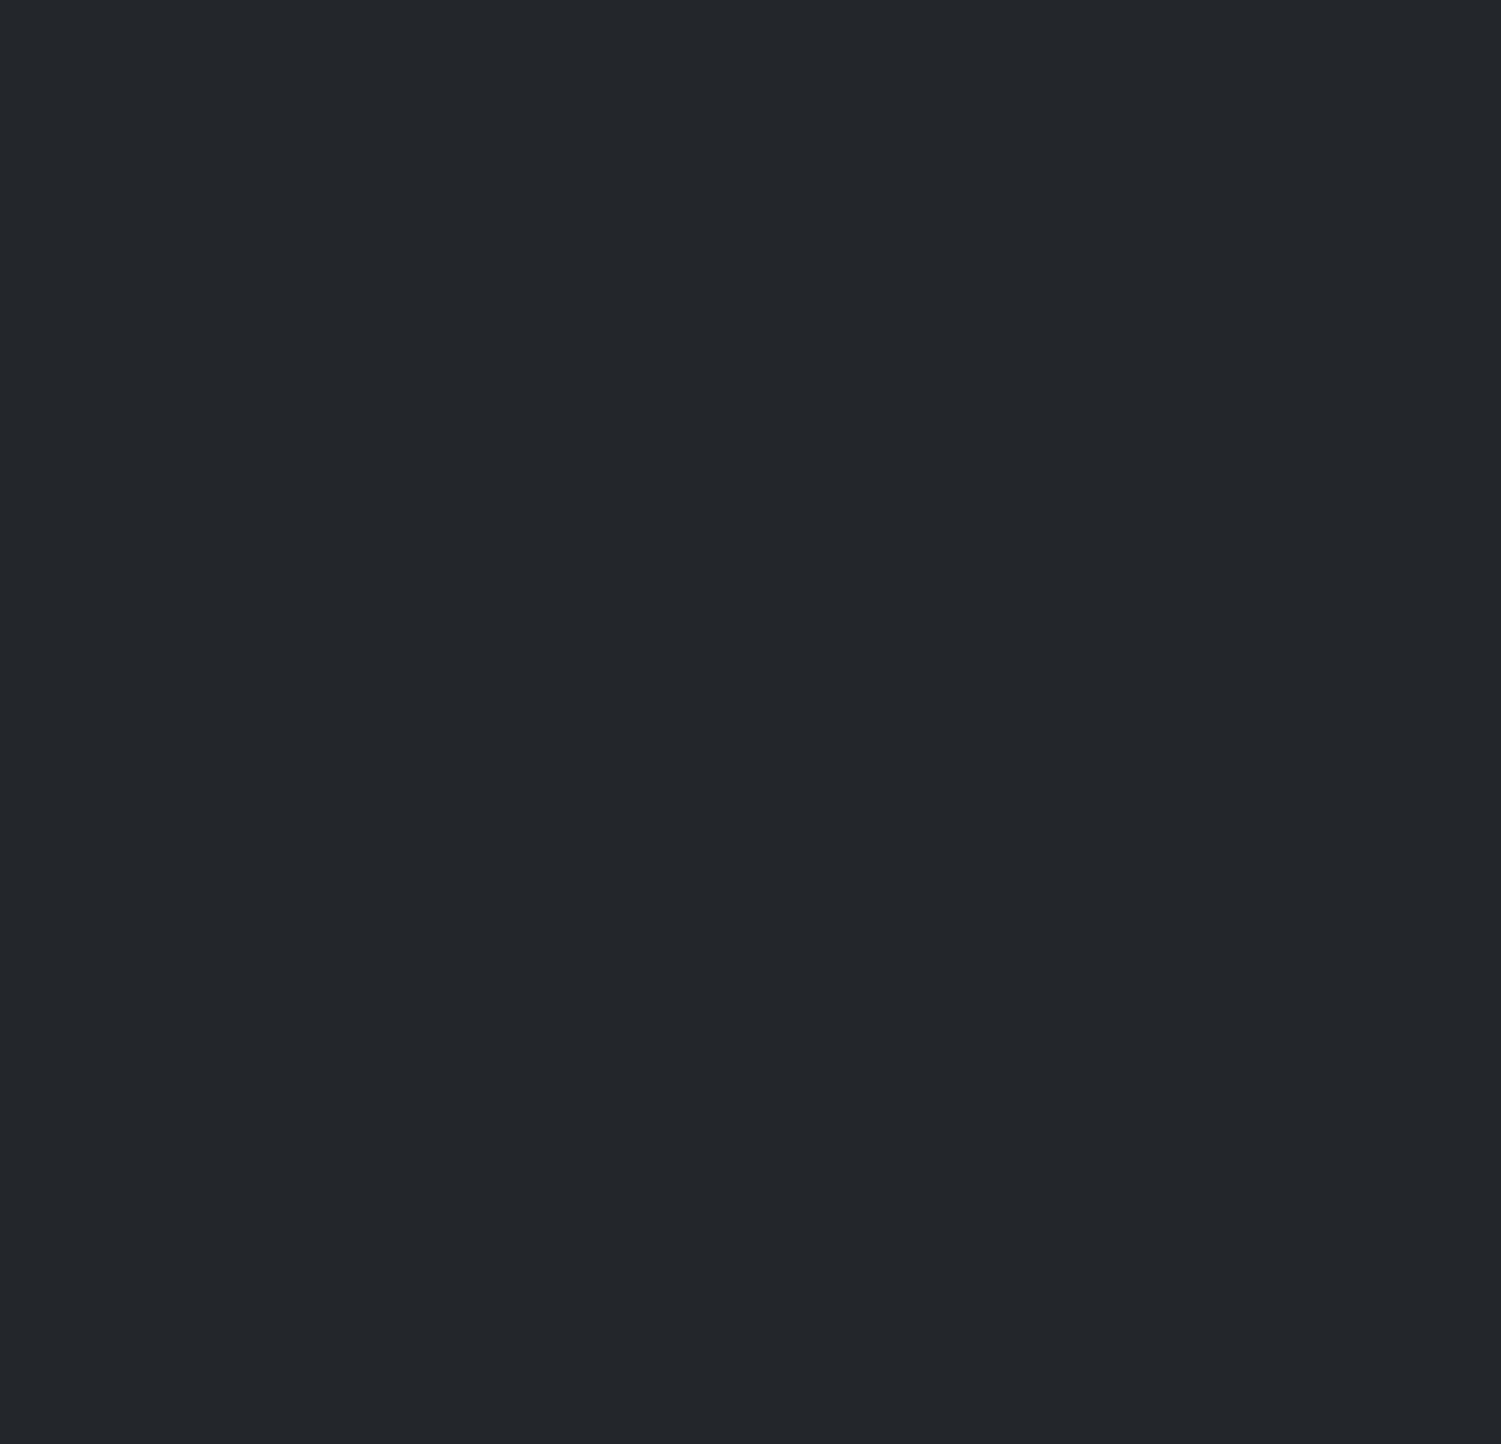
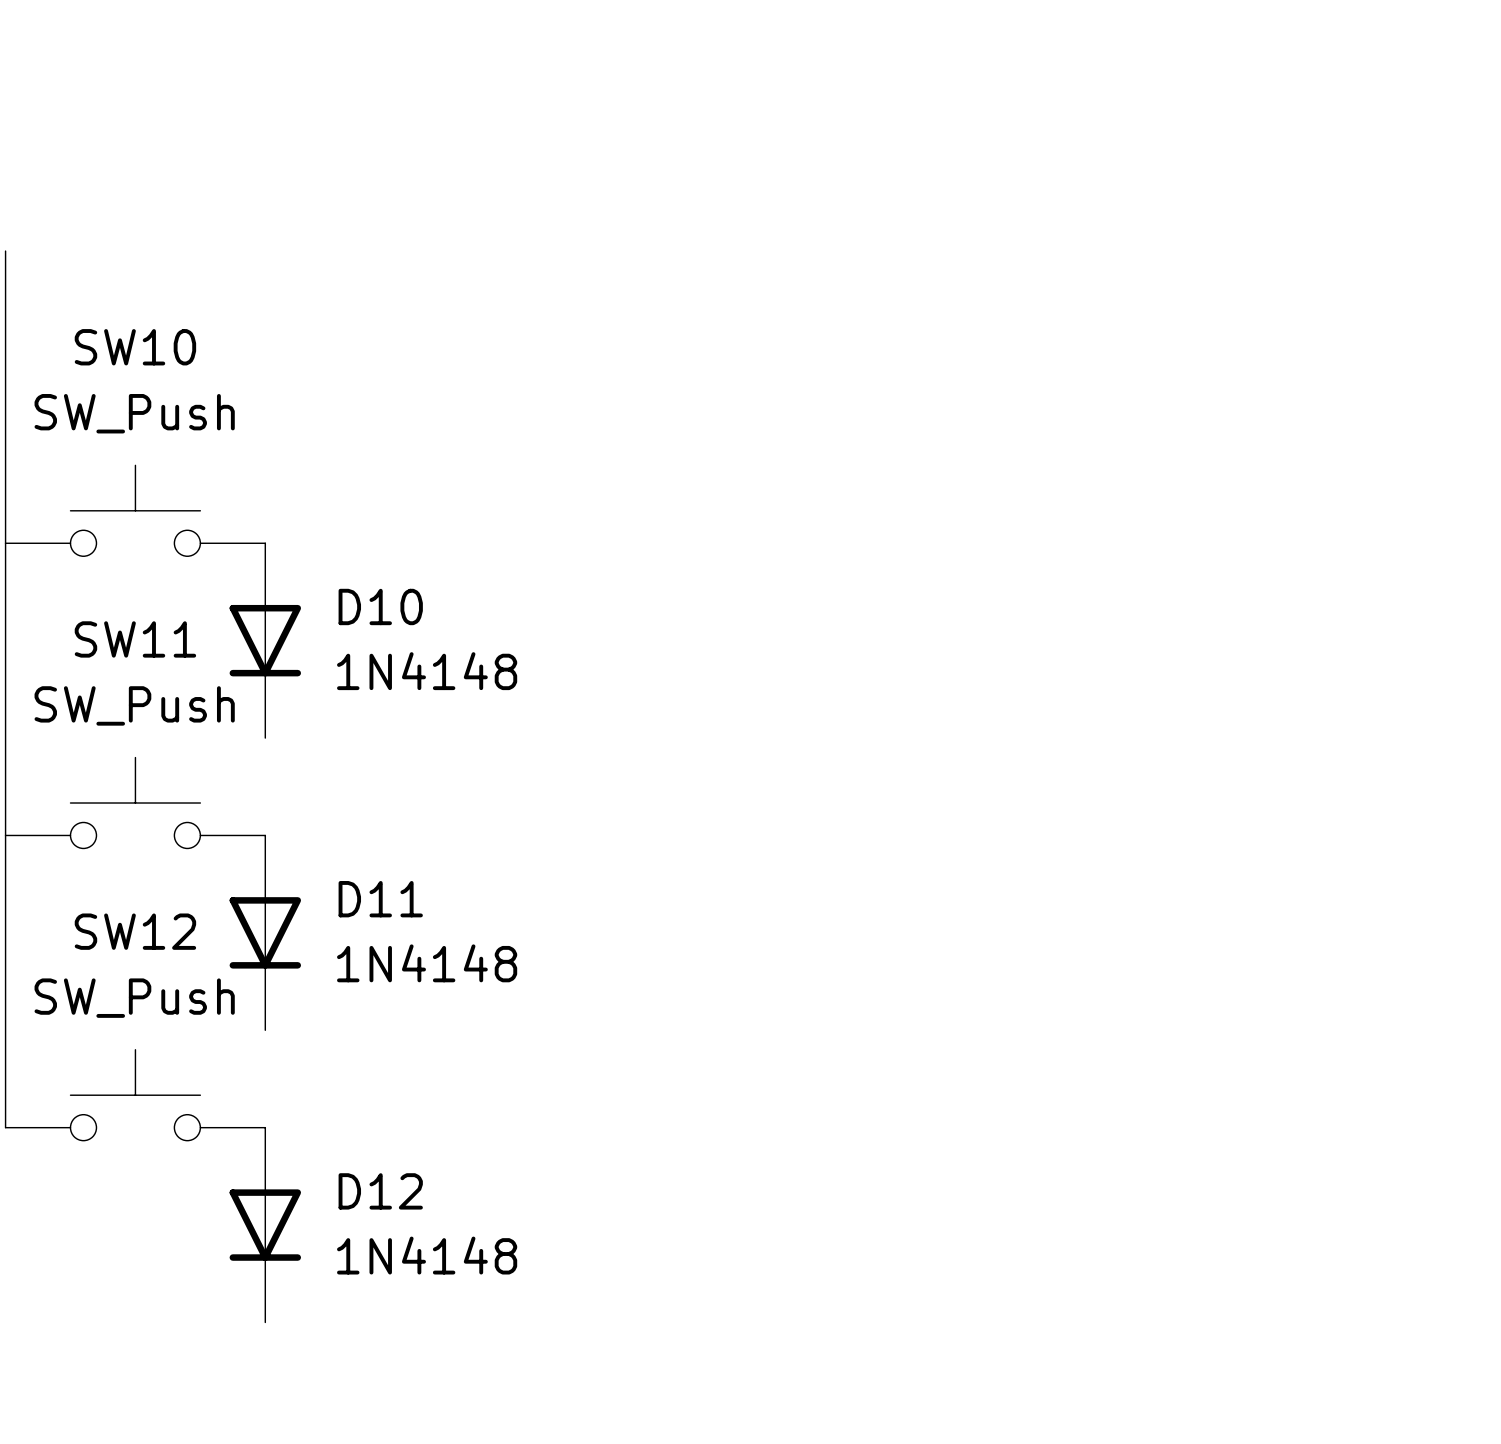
wire: none -> (5, 251) (5, 1127)
SW10: none -> SW_Push (135, 510)
D10: none -> 1N4148 (265, 640)
SW11: none -> SW_Push (135, 803)
D11: none -> 1N4148 (265, 932)
SW12: none -> SW_Push (135, 1095)
D12: none -> 1N4148 (265, 1225)

